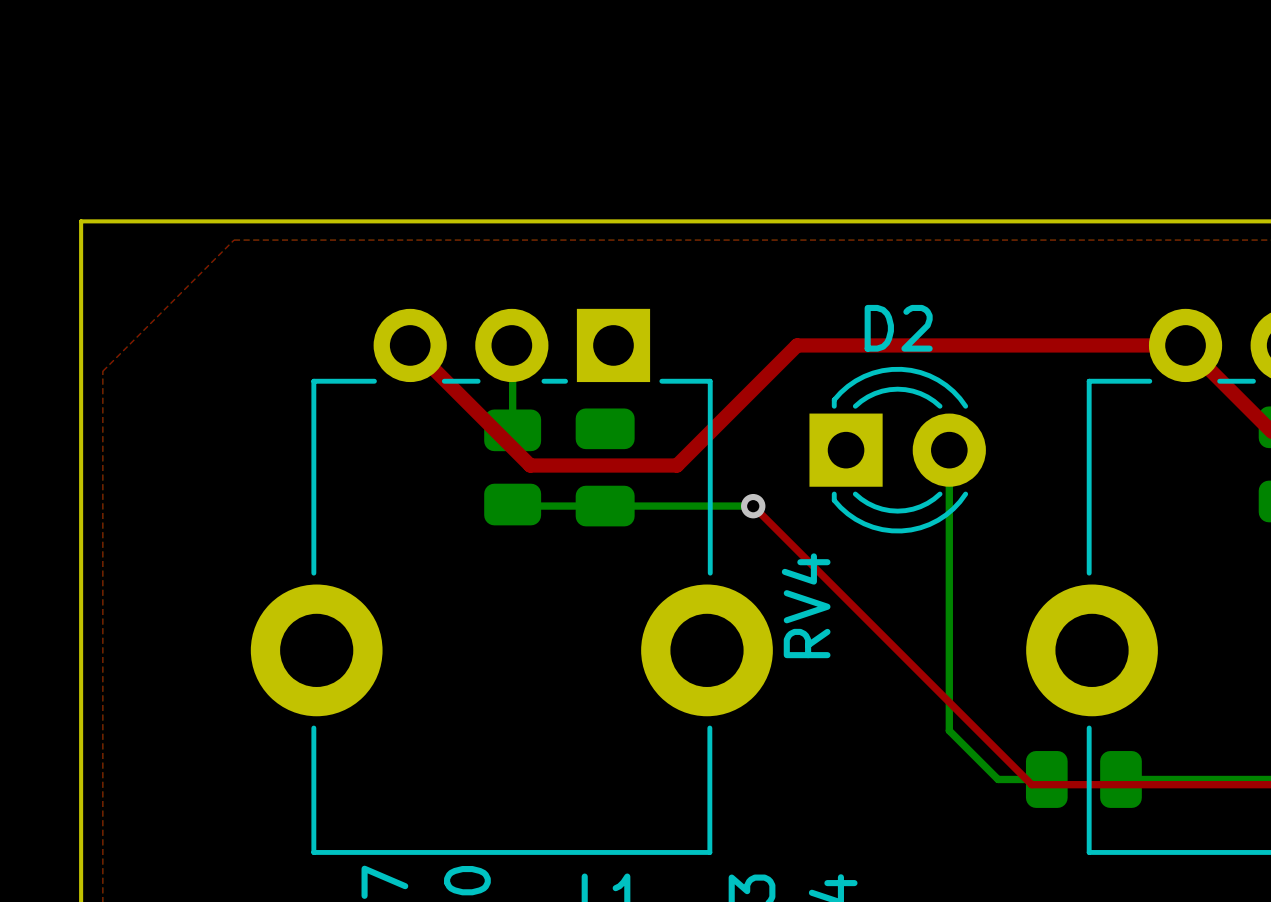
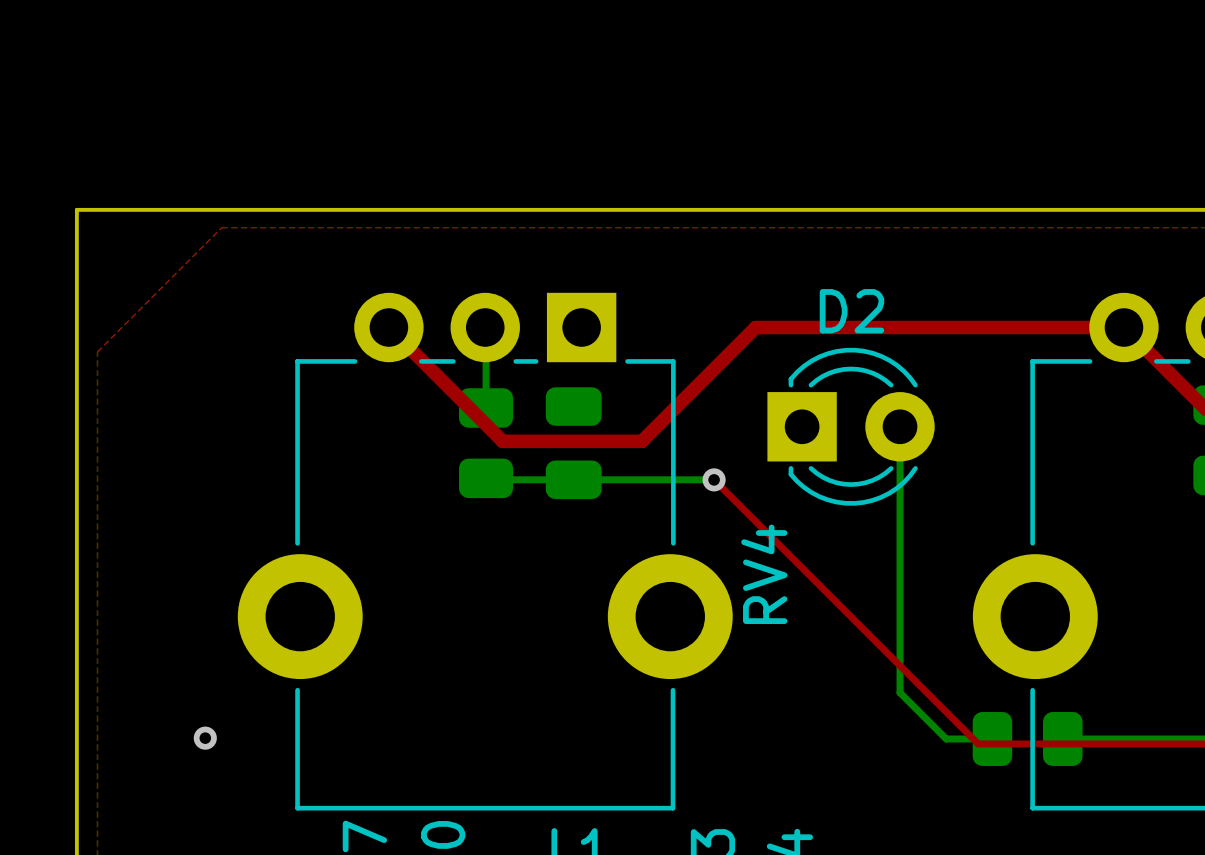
via: none -> (205, 738)

